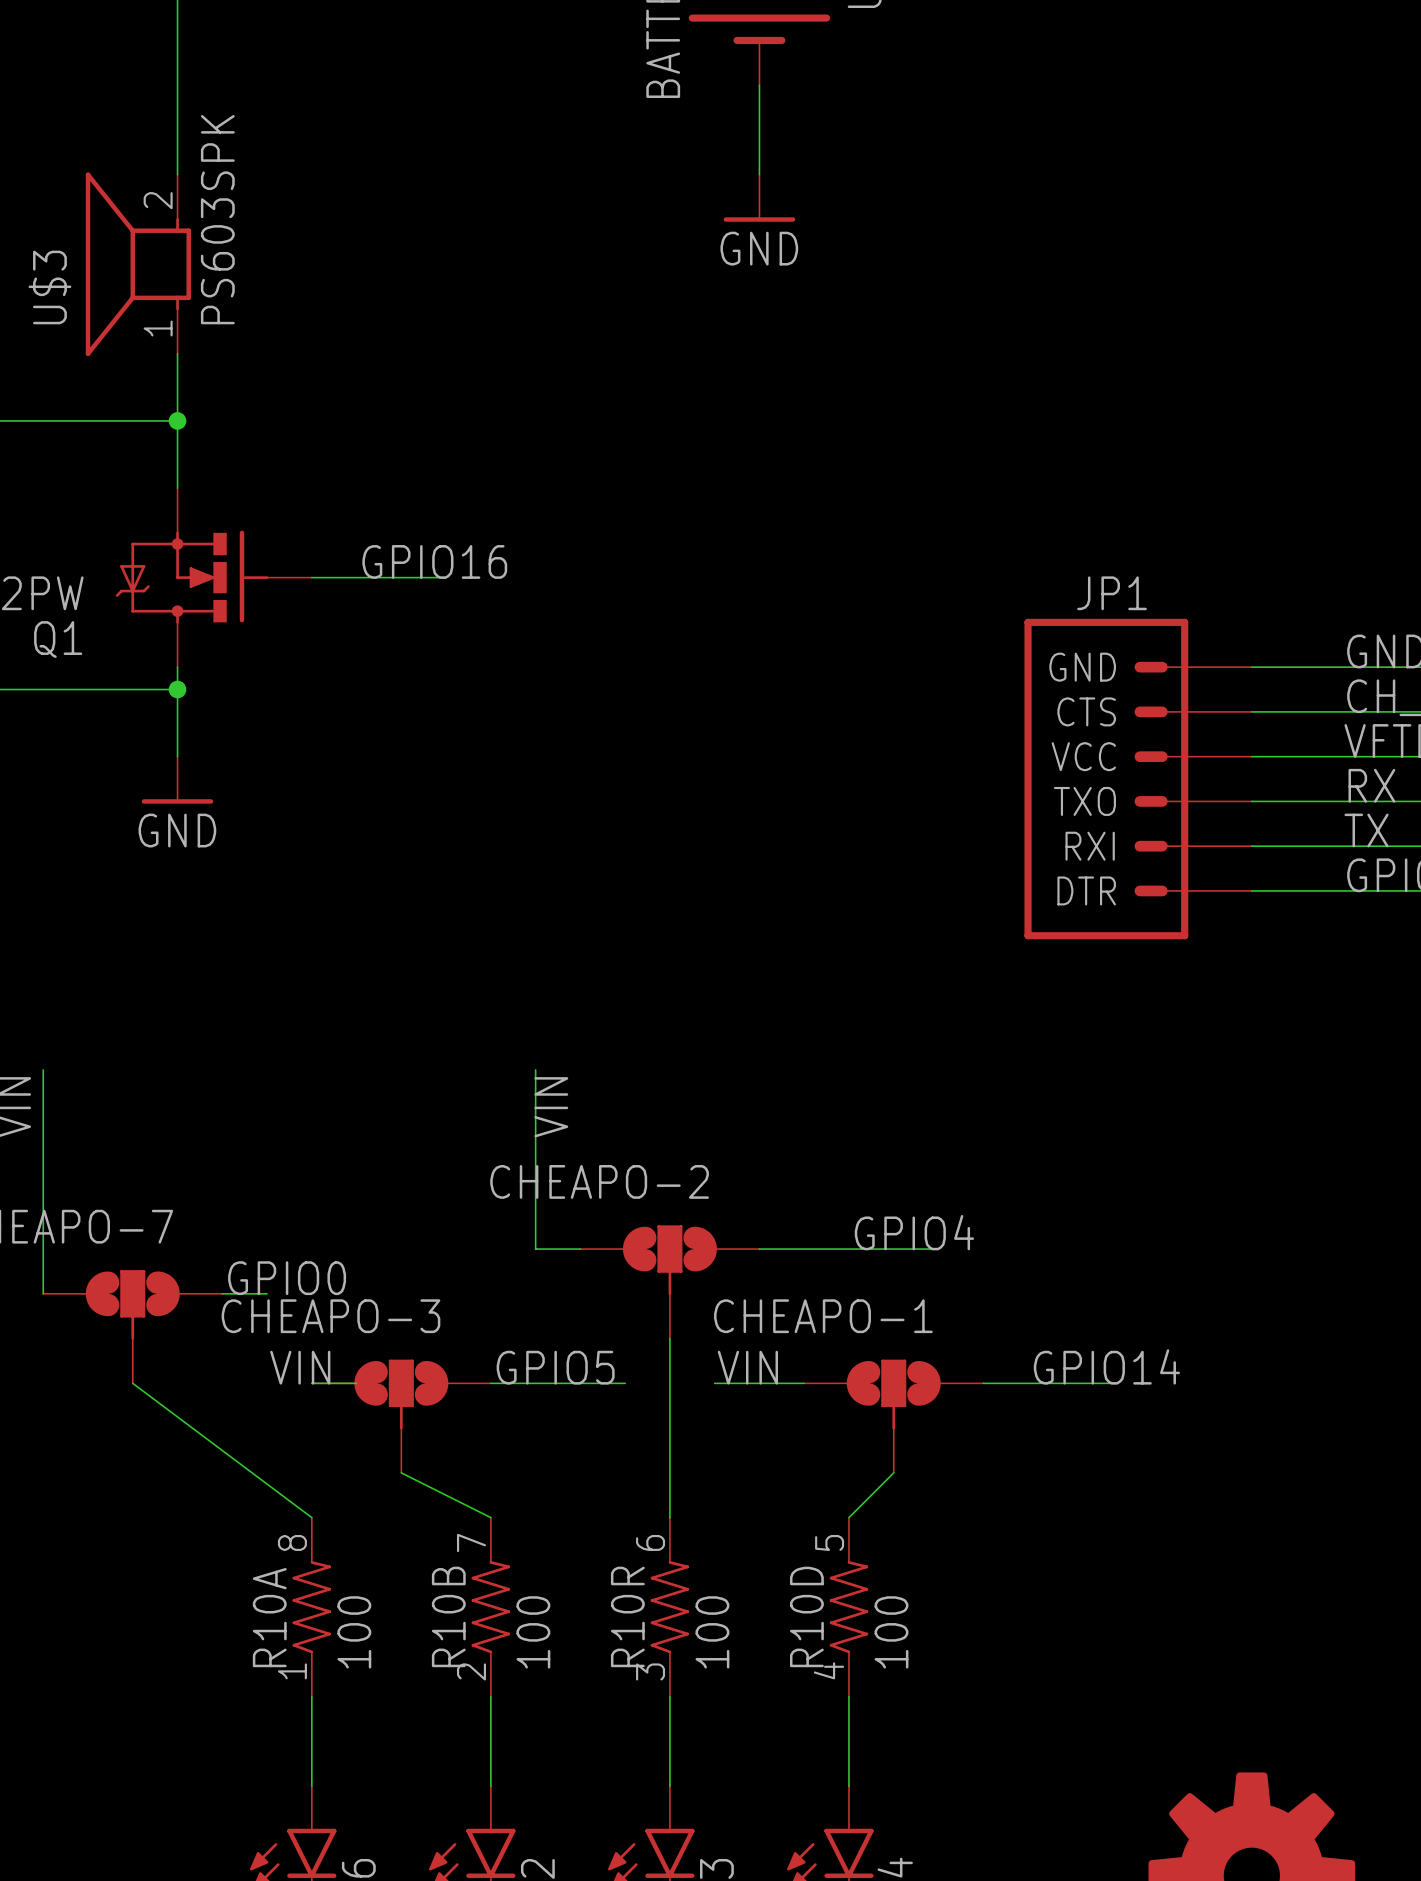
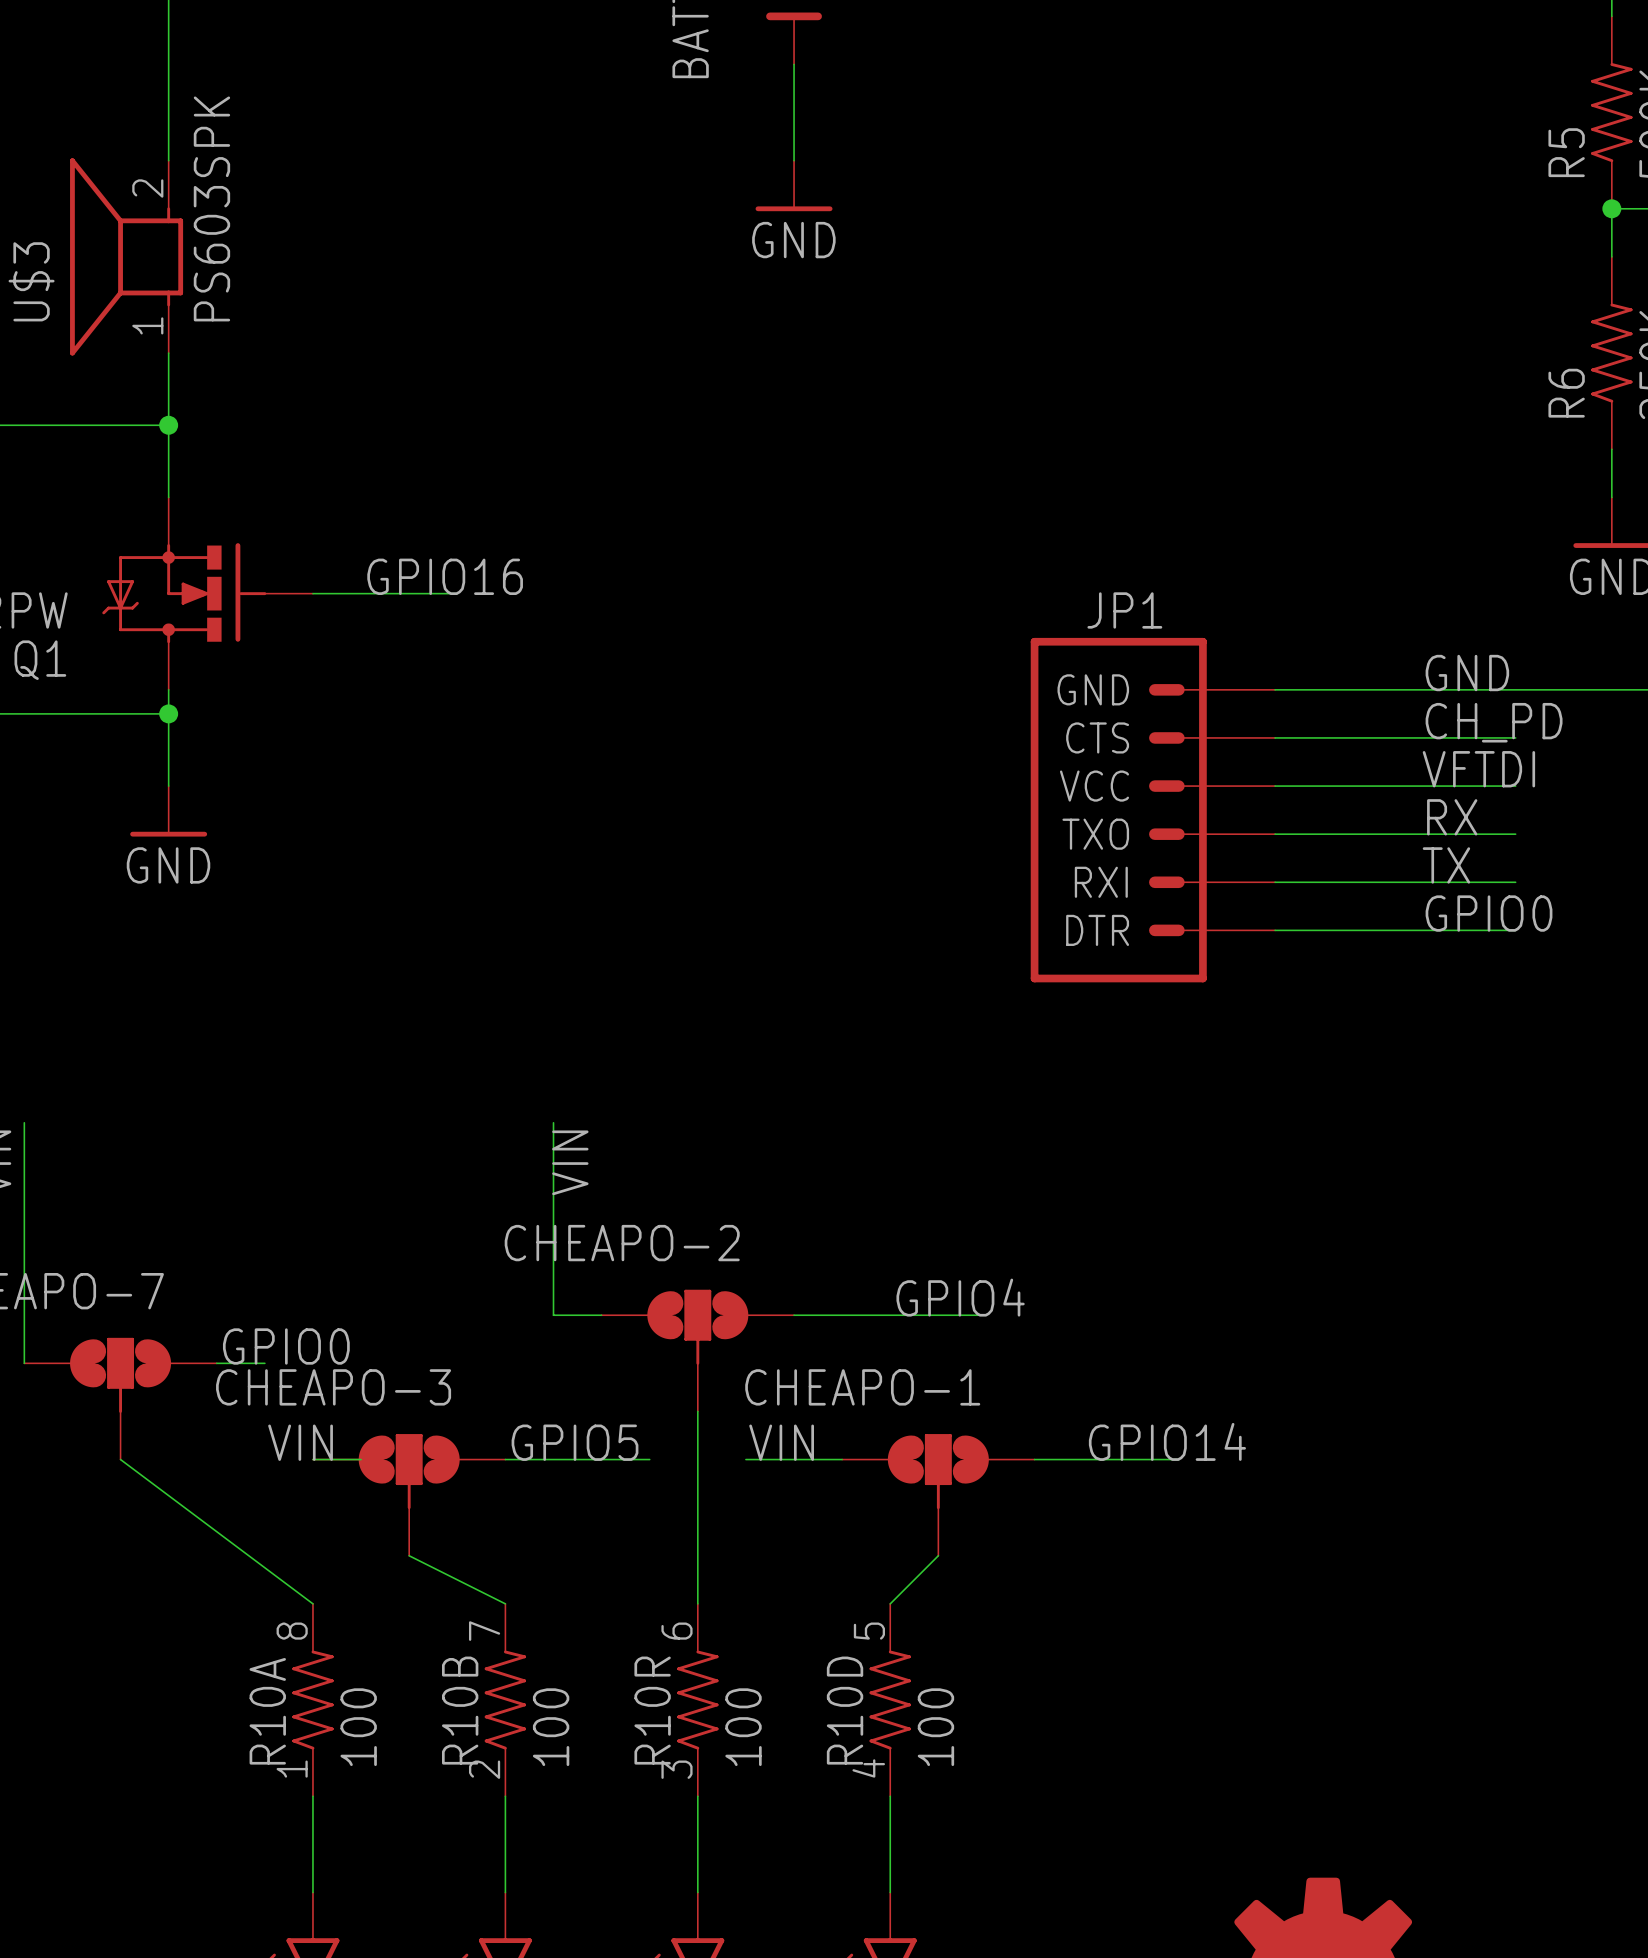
JP1 position: (1138, 779) -> (1152, 810)

